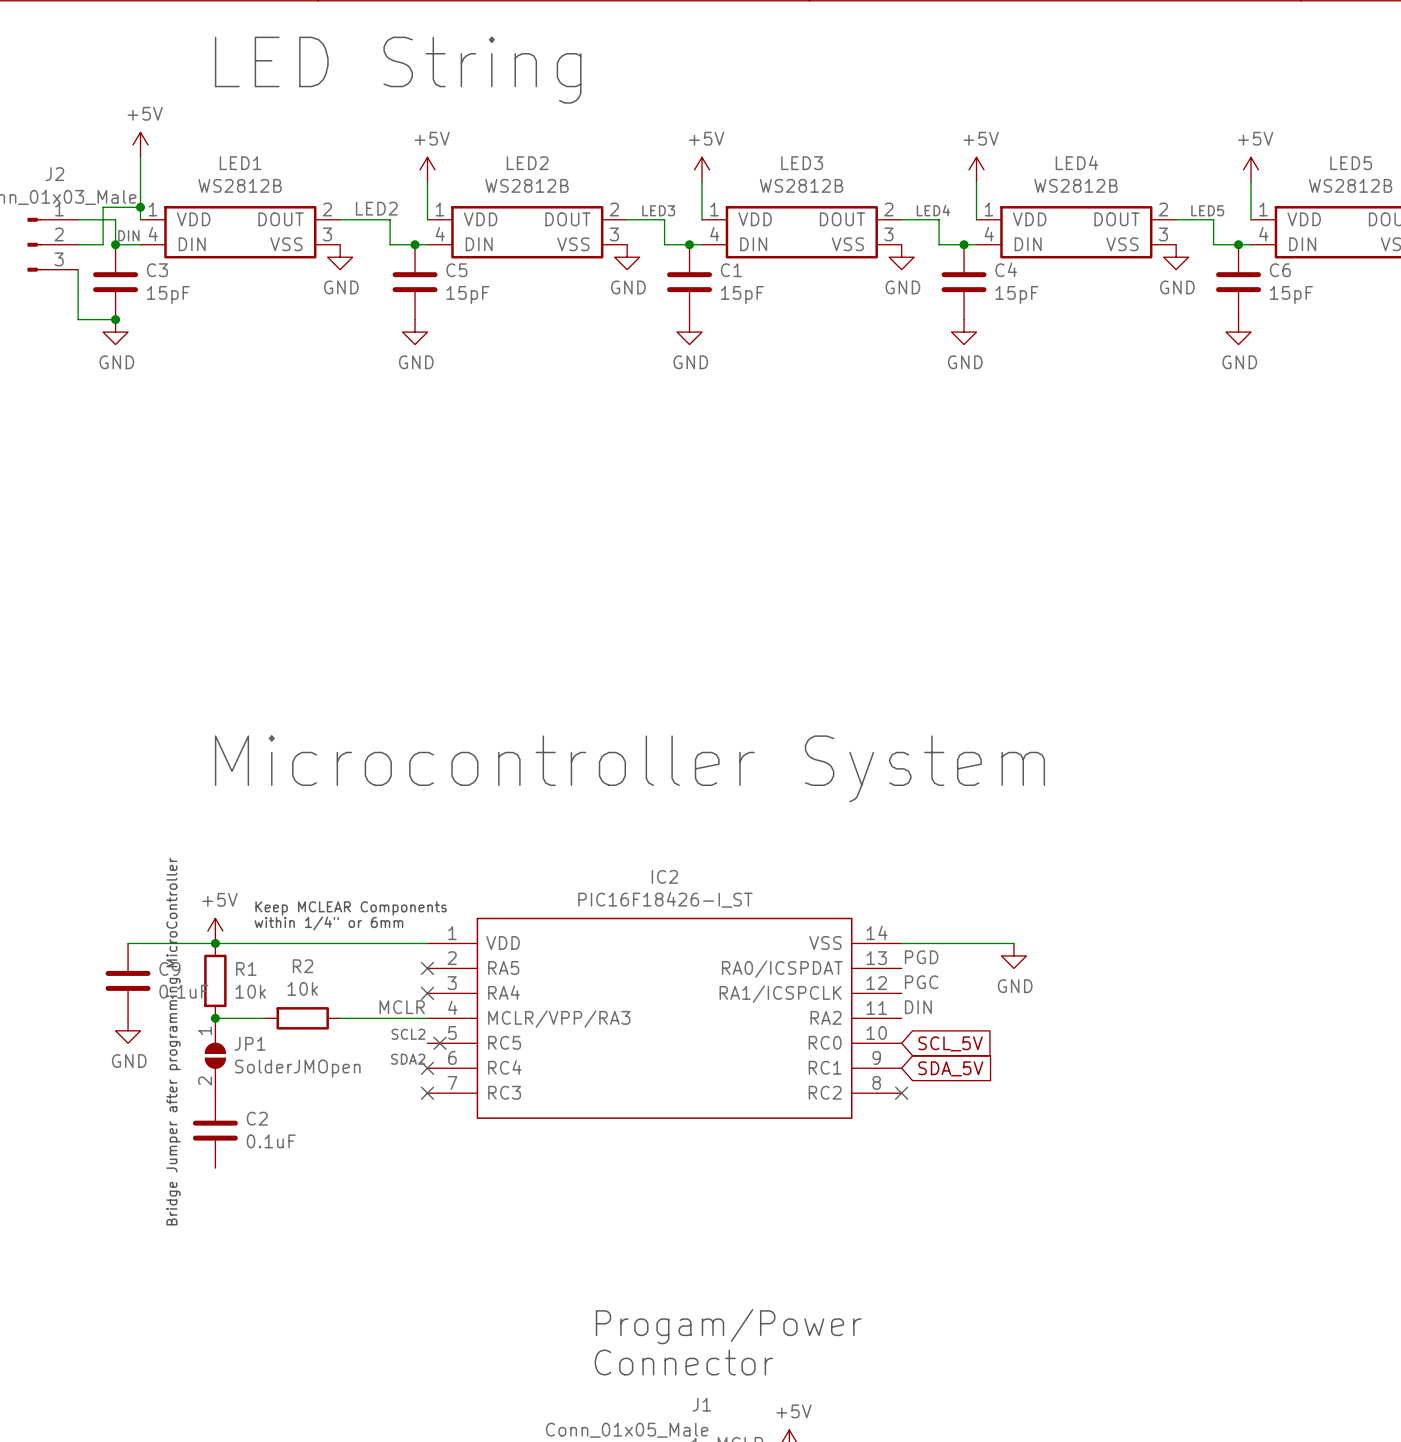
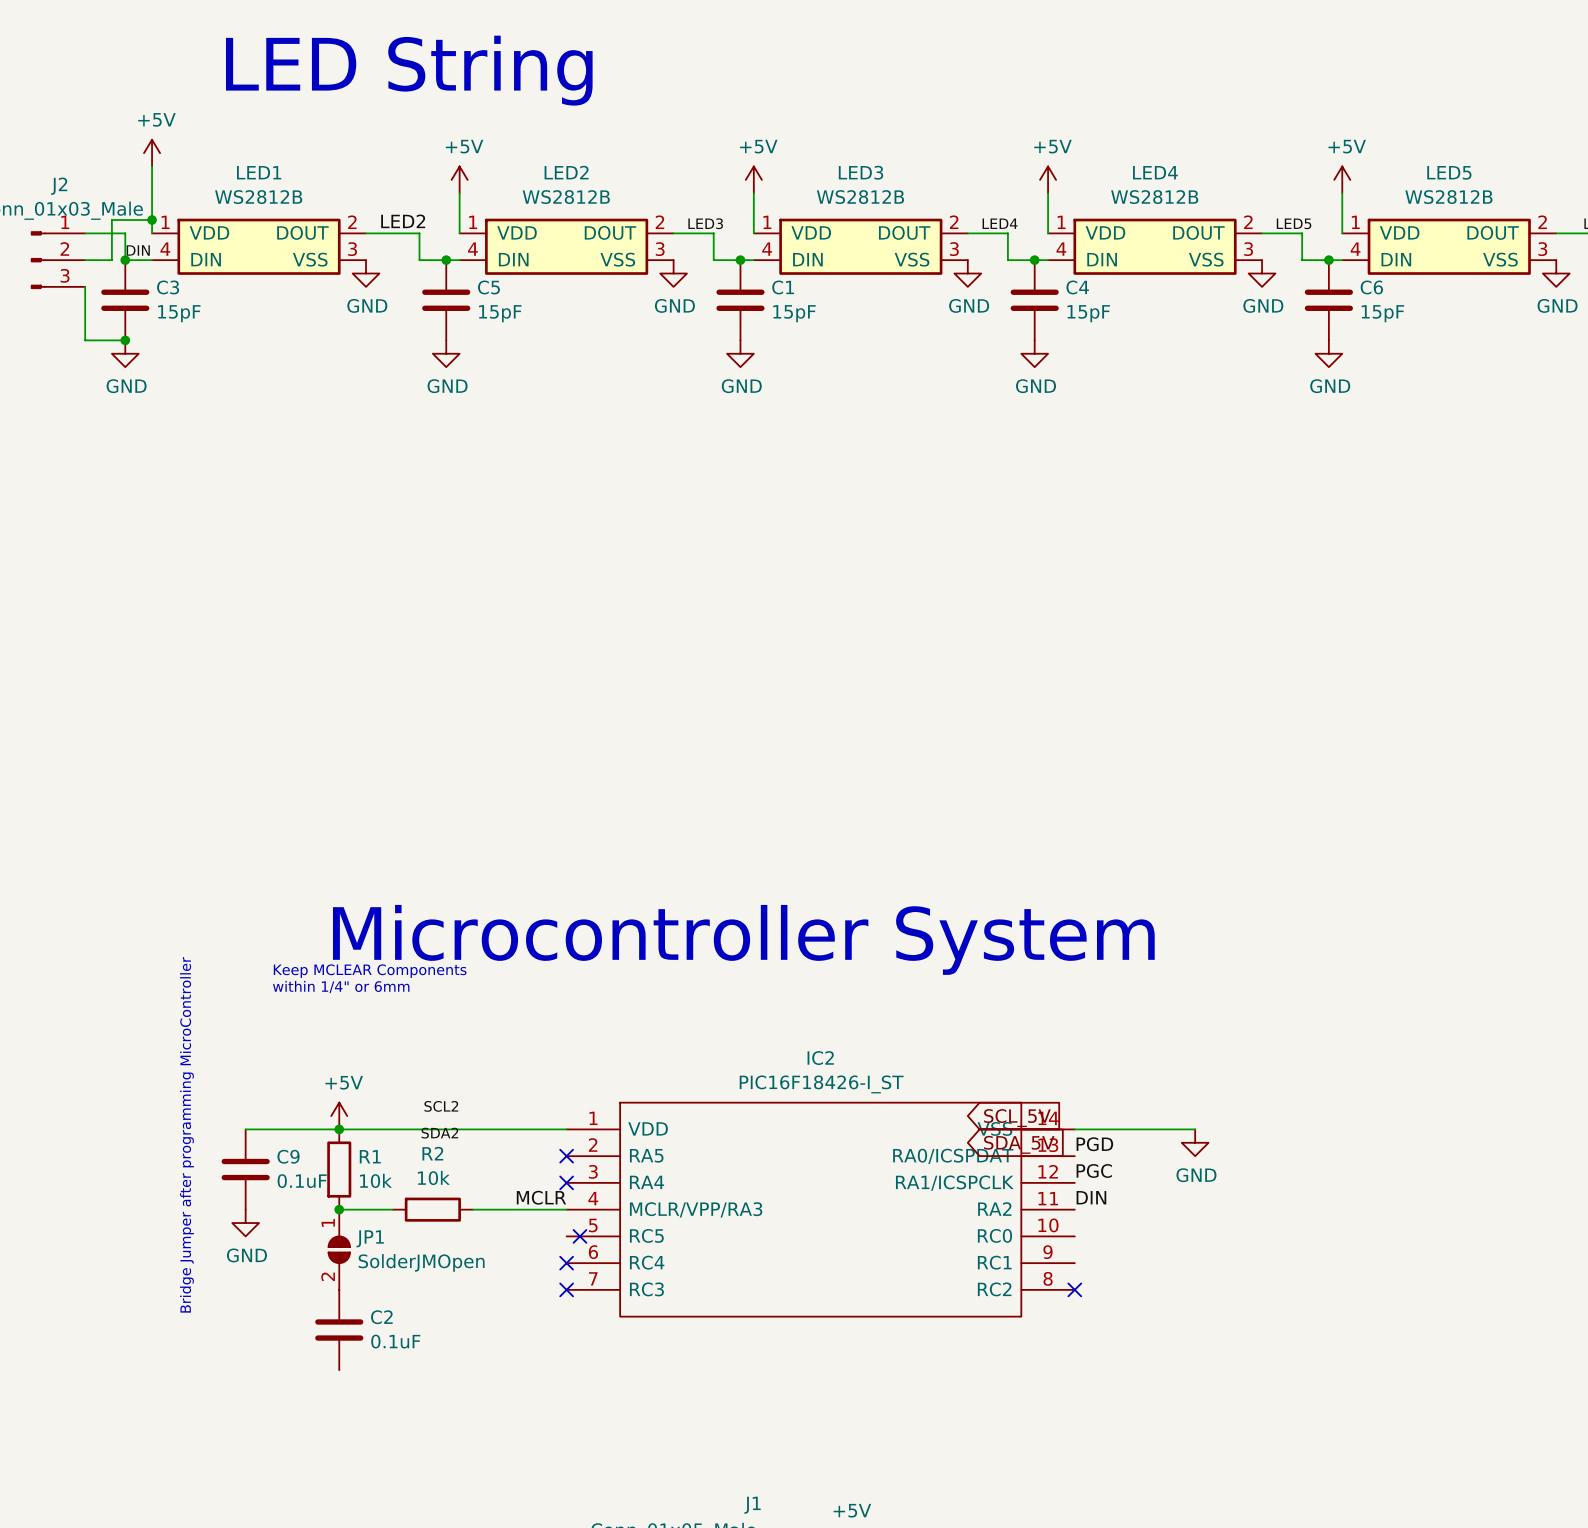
text position: Microcontroller System (629, 768) -> Microcontroller System (743, 939)
power symbol position: +5V (215, 930) -> +5V (339, 1116)
wire: (128, 943) (427, 943) -> (245, 1129) (566, 1129)
junction: (215, 943) -> none
wire: (901, 943) (1013, 943) -> (1074, 1129) (1195, 1129)
power symbol position: GND (1013, 955) -> GND (1195, 1142)
label position: PGD (921, 957) -> PGD (1094, 1144)
no-connect mark: (427, 968) -> none
C9 position: (128, 980) -> (245, 1169)
R1 position: (215, 980) -> (339, 1169)
label position: PGC (921, 982) -> PGC (1094, 1170)
no-connect mark: (427, 993) -> none
label position: MCLR (402, 1007) -> MCLR (541, 1197)
label position: DIN (918, 1007) -> DIN (1091, 1197)
wire: (215, 1018) (265, 1018) -> (339, 1209) (392, 1209)
junction: (215, 1018) -> none
R2 position: (302, 1018) -> (432, 1209)
wire: (340, 1018) (427, 1018) -> (473, 1209) (566, 1209)
IC2 position: (664, 1018) -> (820, 1209)
power symbol position: GND (128, 1030) -> GND (245, 1223)
no-connect mark: (439, 1043) -> none
JP1 position: (215, 1055) -> (339, 1249)
junction: none -> (339, 1129)
no-connect mark: (427, 1068) -> none
no-connect mark: none -> (566, 1156)
no-connect mark: (427, 1093) -> none
no-connect mark: (901, 1093) -> none
no-connect mark: none -> (566, 1182)
C2 position: (215, 1130) -> (339, 1330)
junction: none -> (339, 1209)
no-connect mark: none -> (579, 1236)
no-connect mark: none -> (566, 1263)
no-connect mark: none -> (566, 1289)
no-connect mark: none -> (1074, 1289)
text: Progam/Power (728, 1326) -> none
text: Connector (683, 1362) -> none

